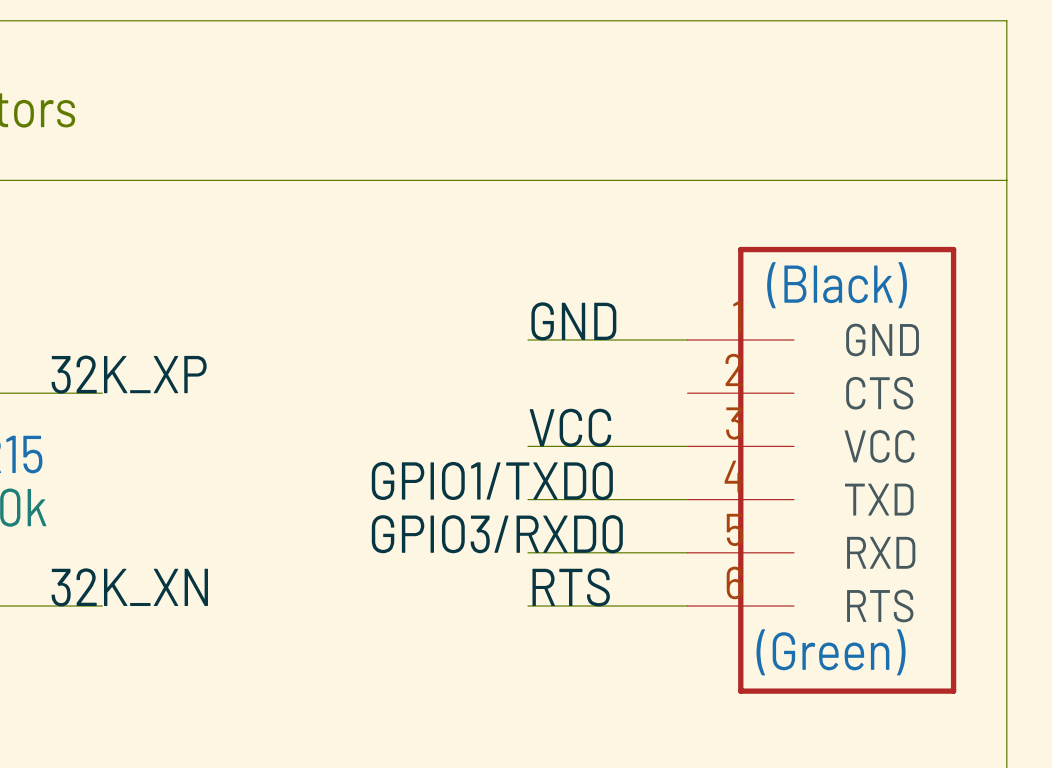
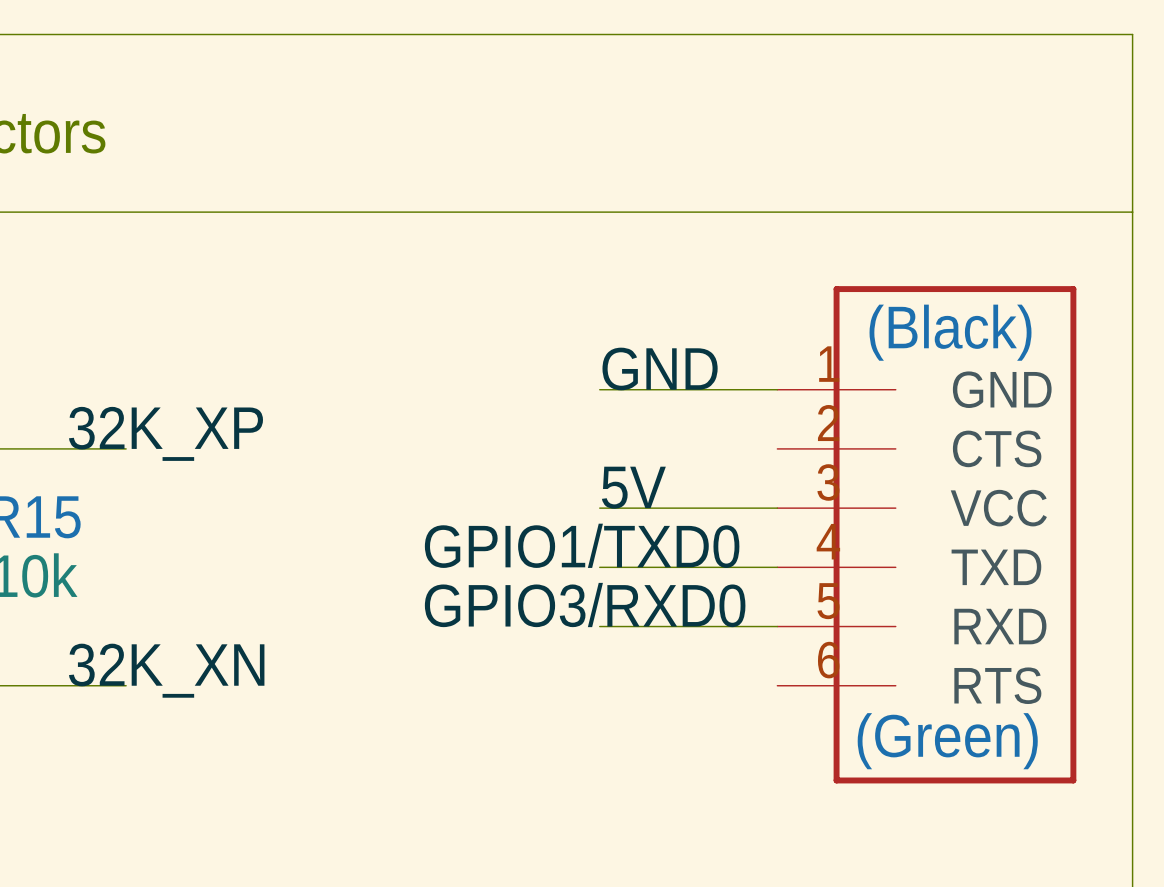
label: VCC (570, 427) -> 5V (633, 487)
label: RTS (571, 587) -> none
wire: (527, 606) (687, 606) -> none

